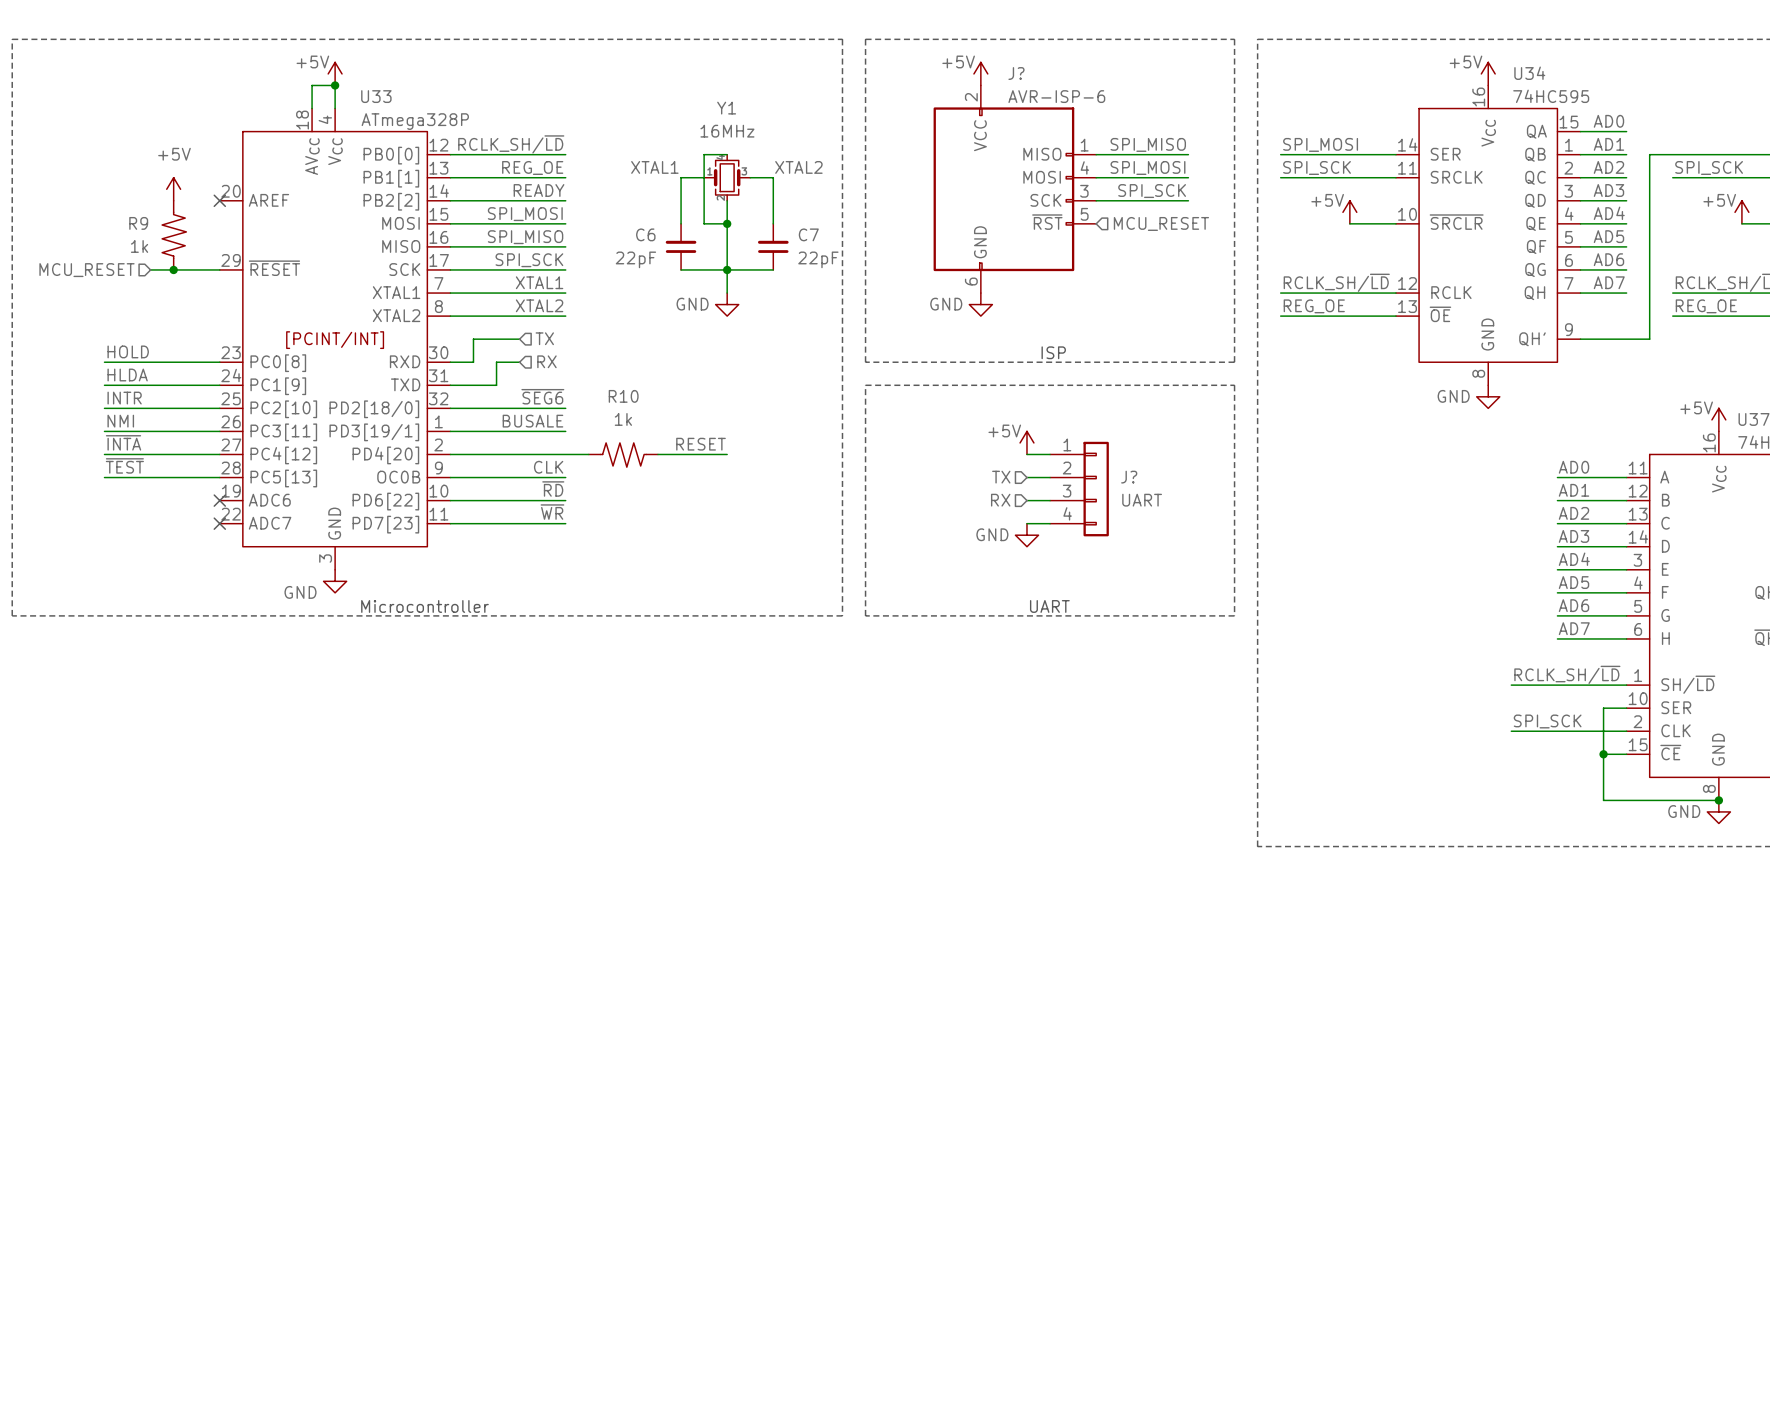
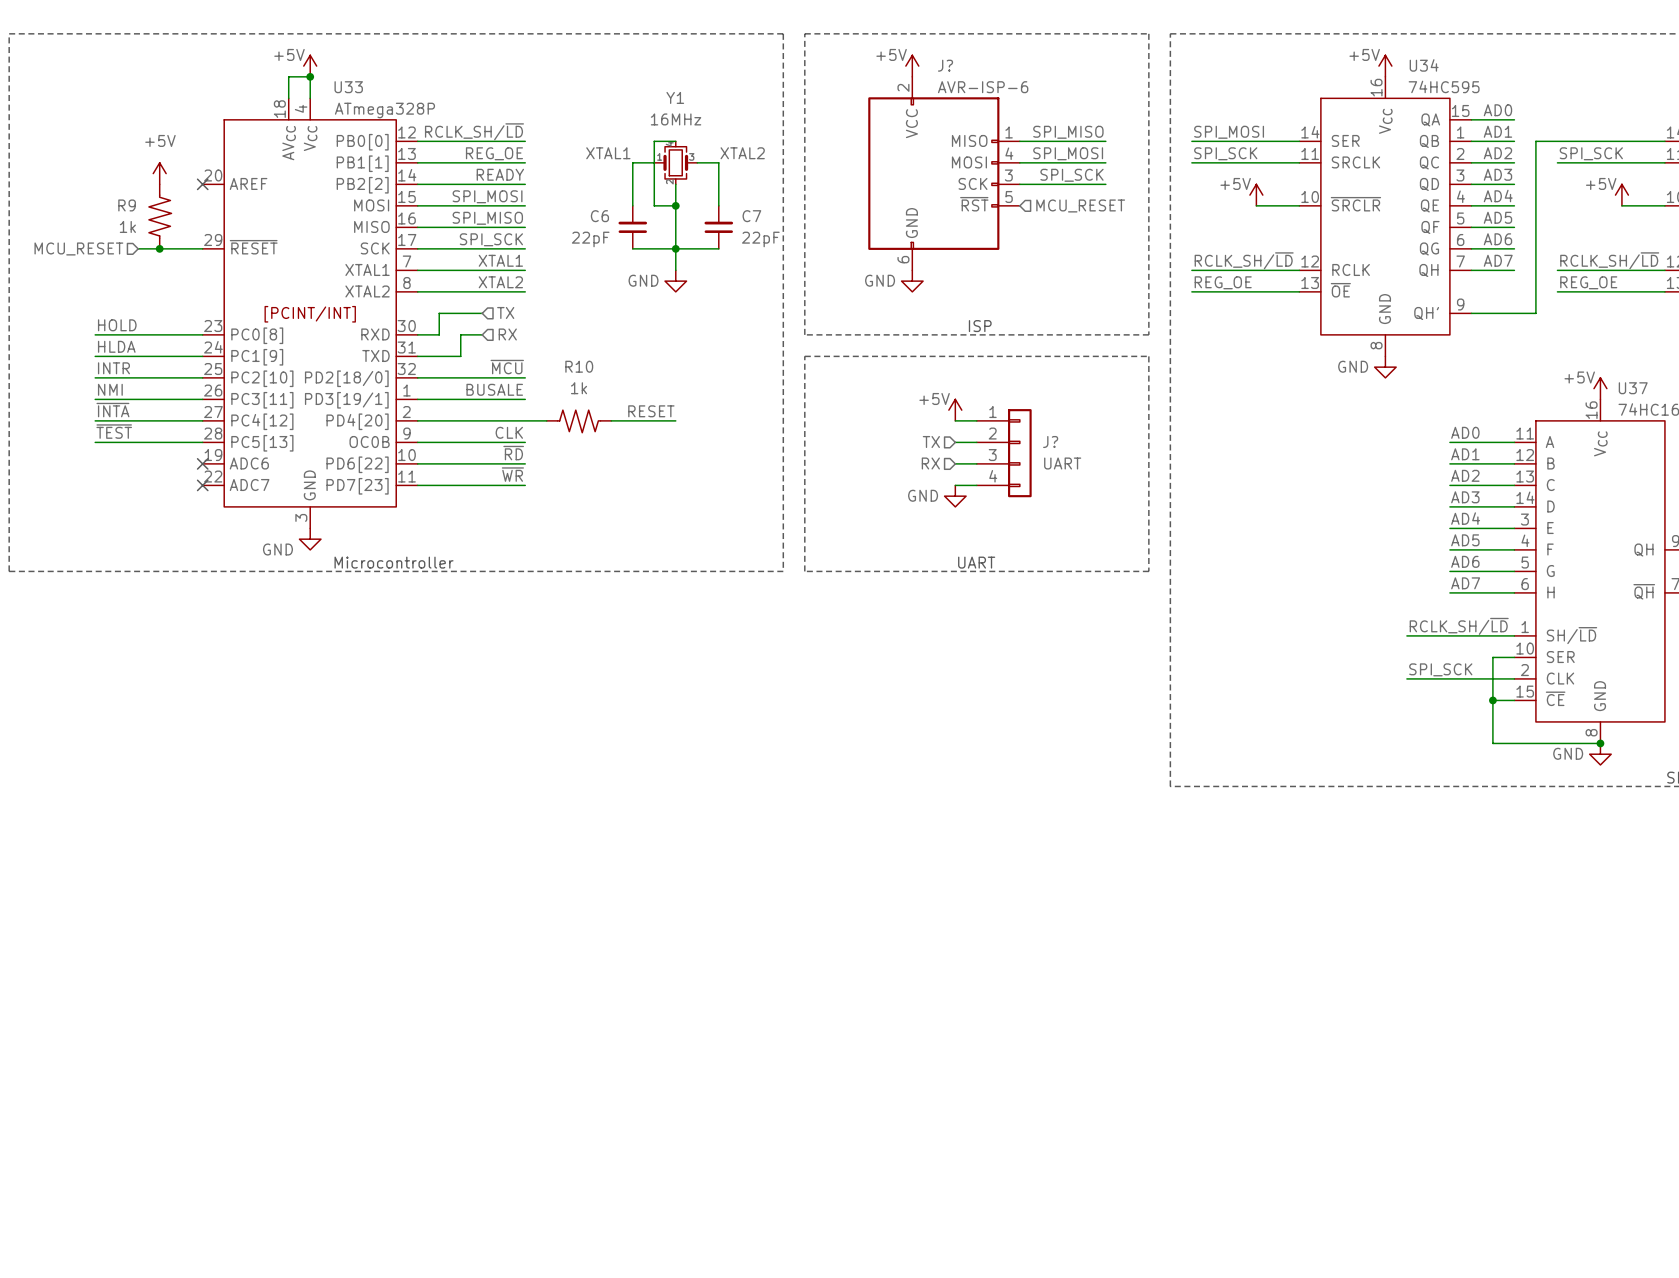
label: ~{SEG6} (542, 396) -> ~{MCU} (507, 367)

